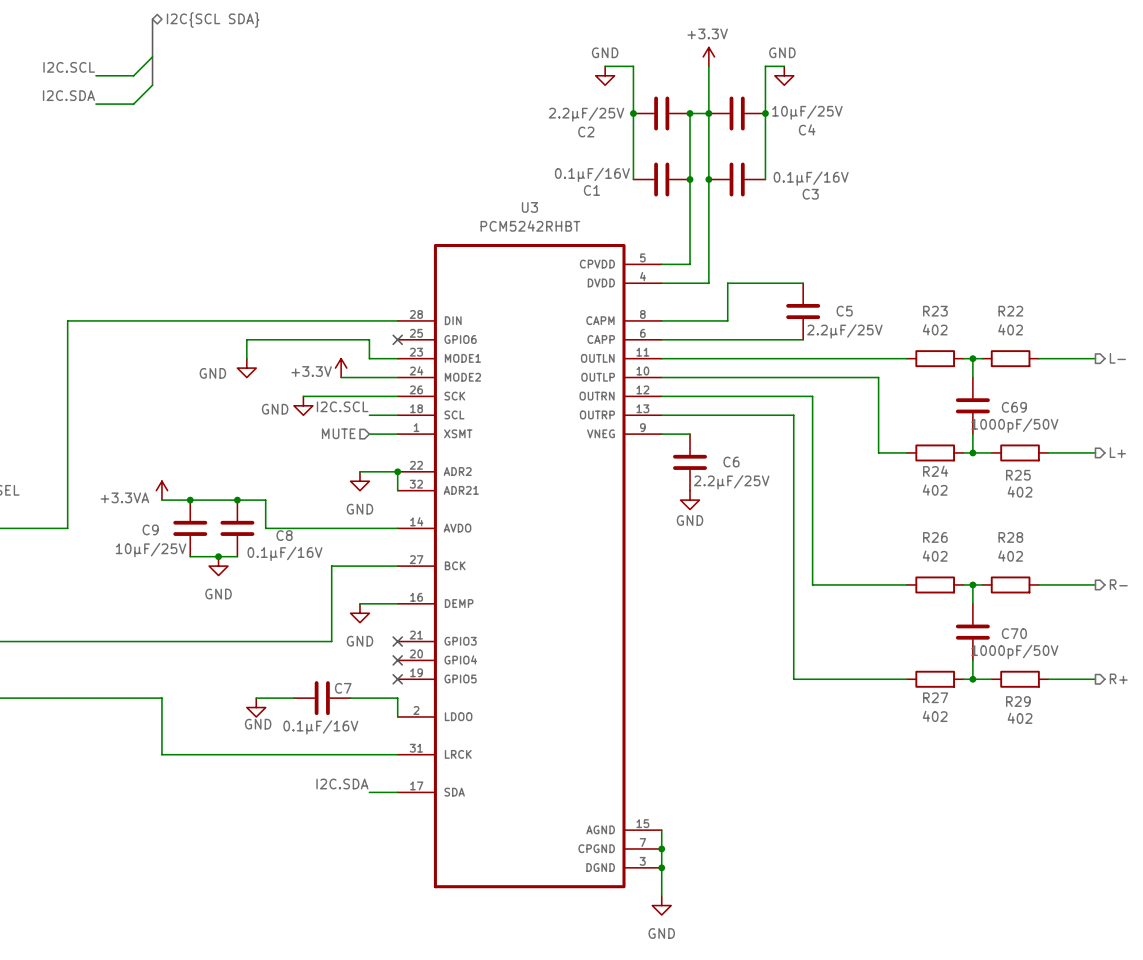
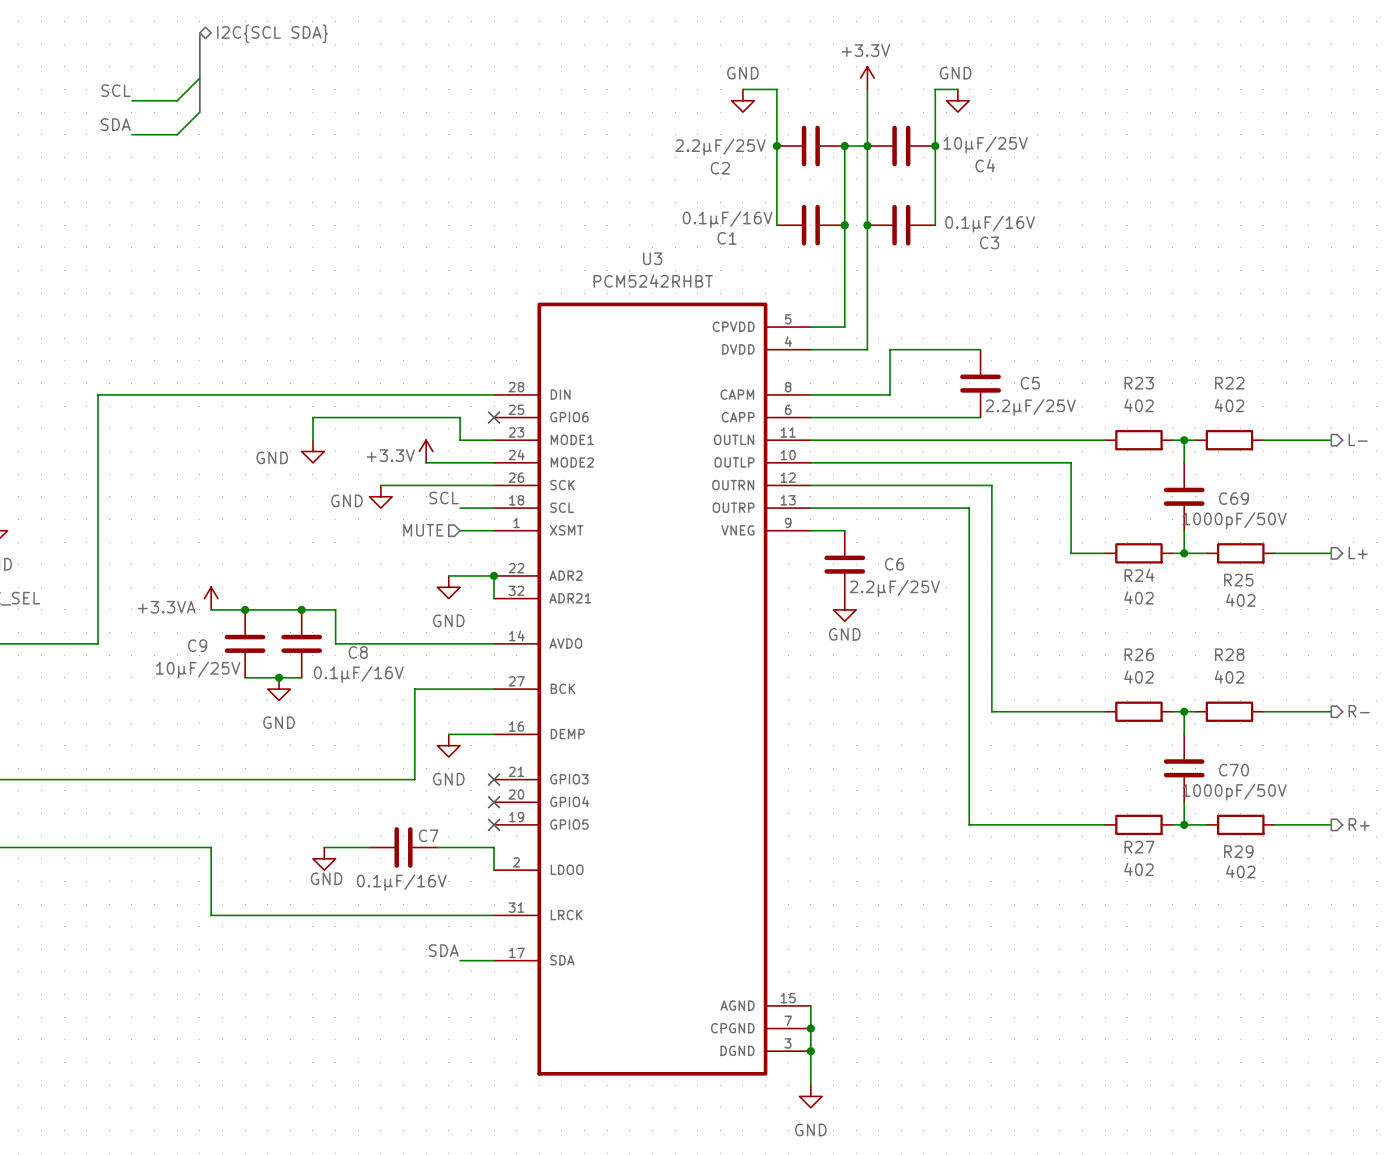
label: I2C.SCL (69, 67) -> SCL (115, 90)
label: I2C.SDA (68, 95) -> SDA (115, 124)
label: I2C.SCL (342, 406) -> SCL (444, 497)
label: I2C.SDA (342, 784) -> SDA (443, 950)

